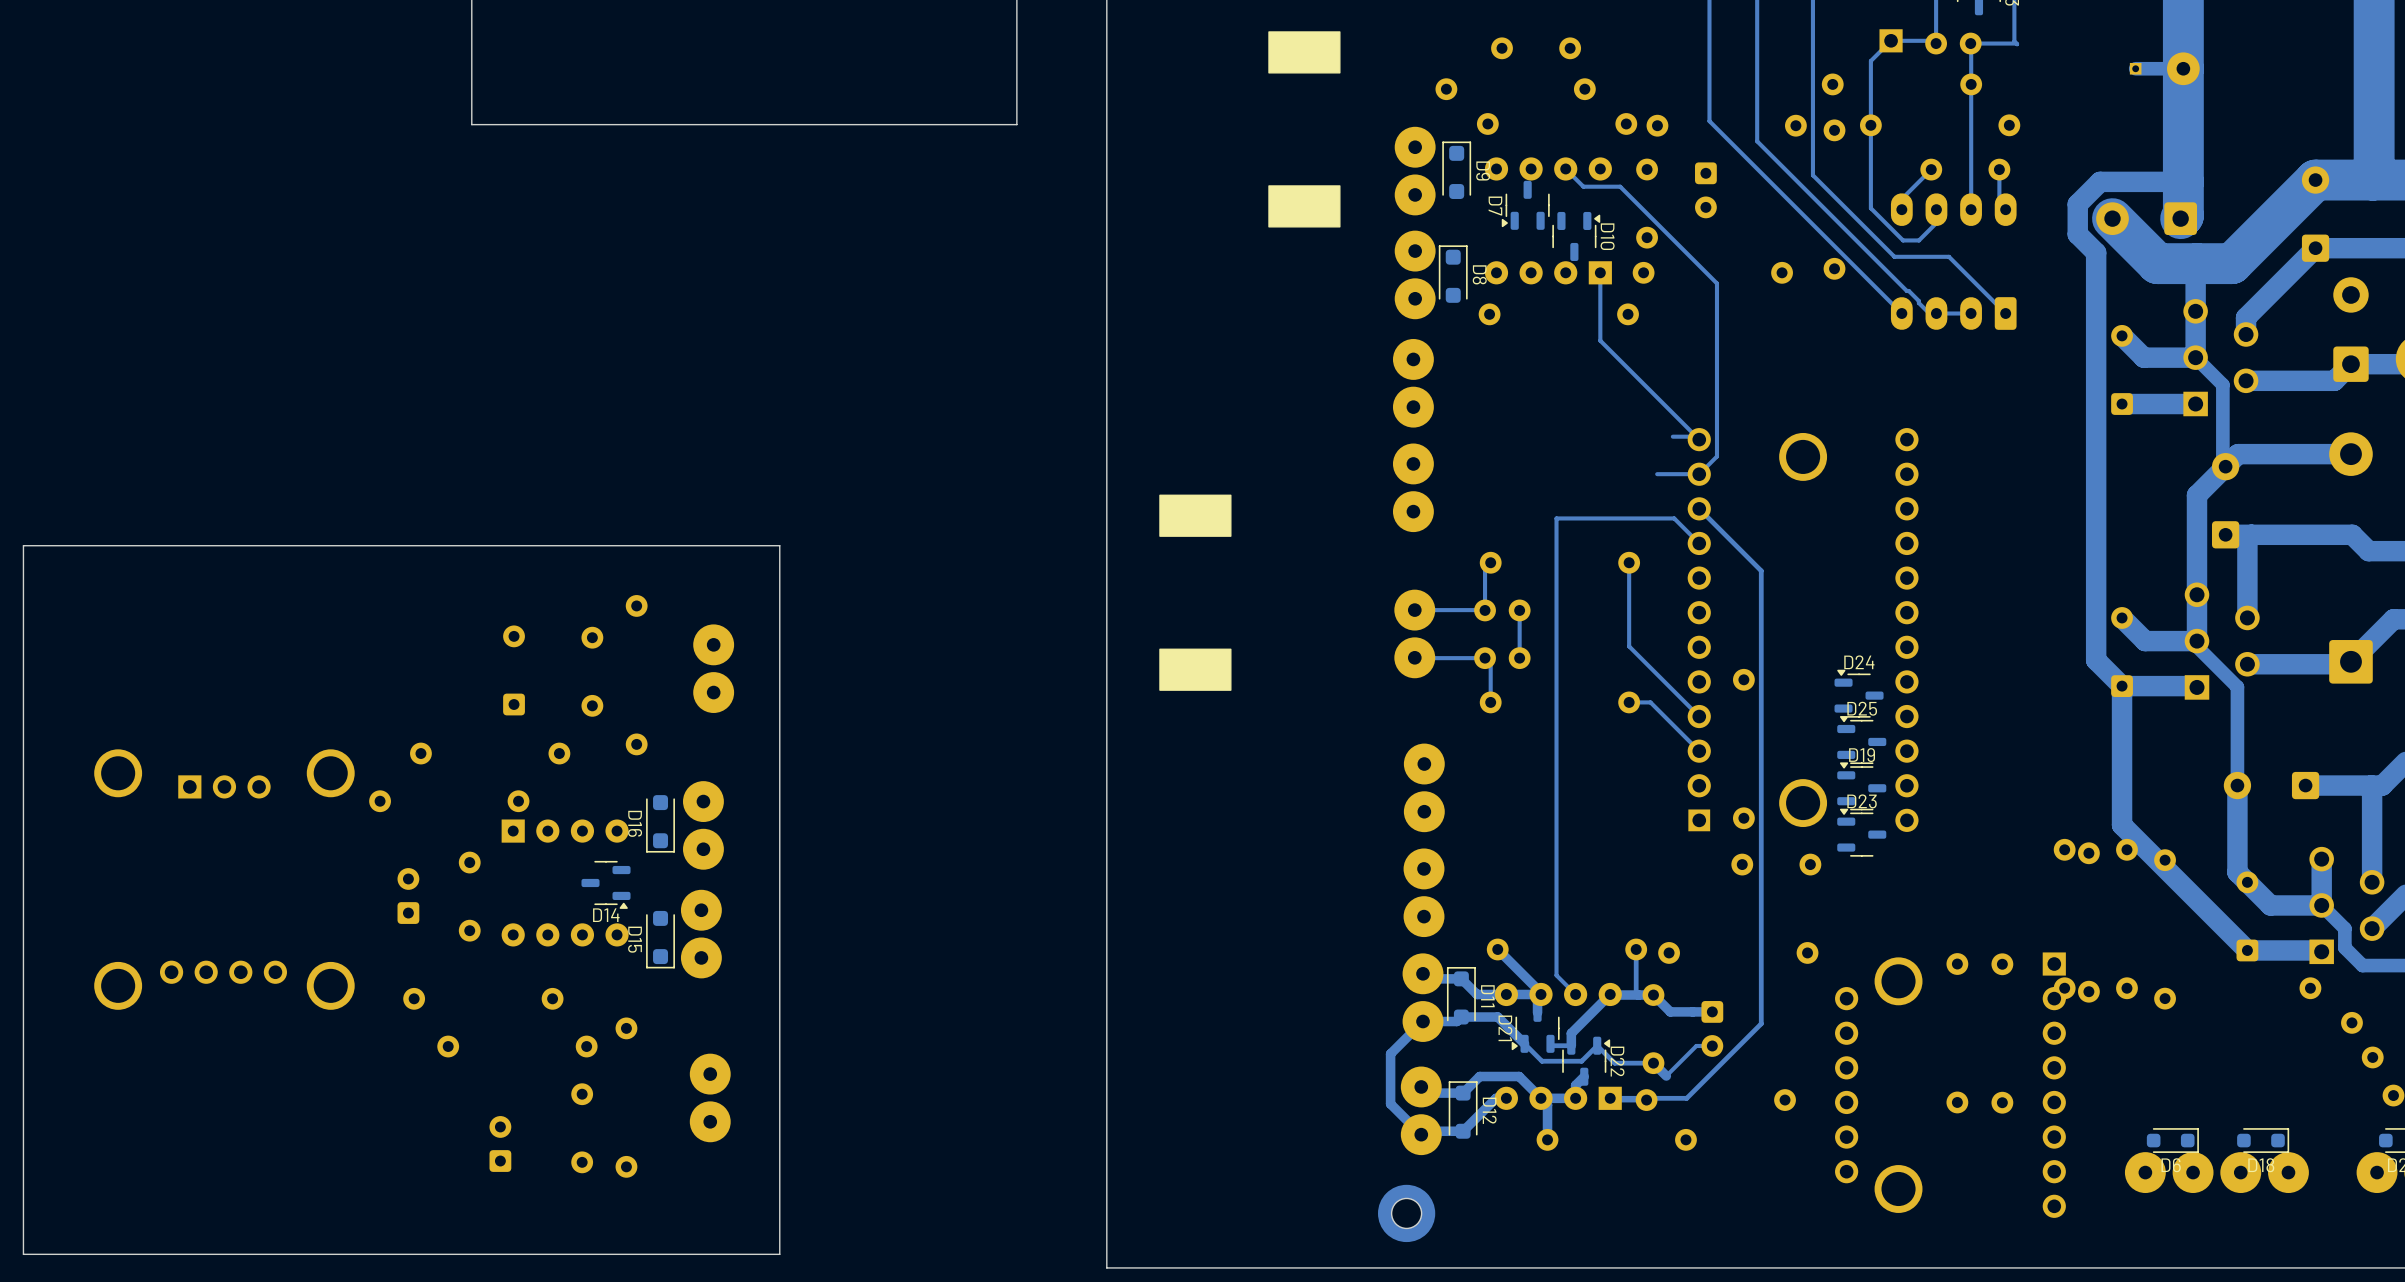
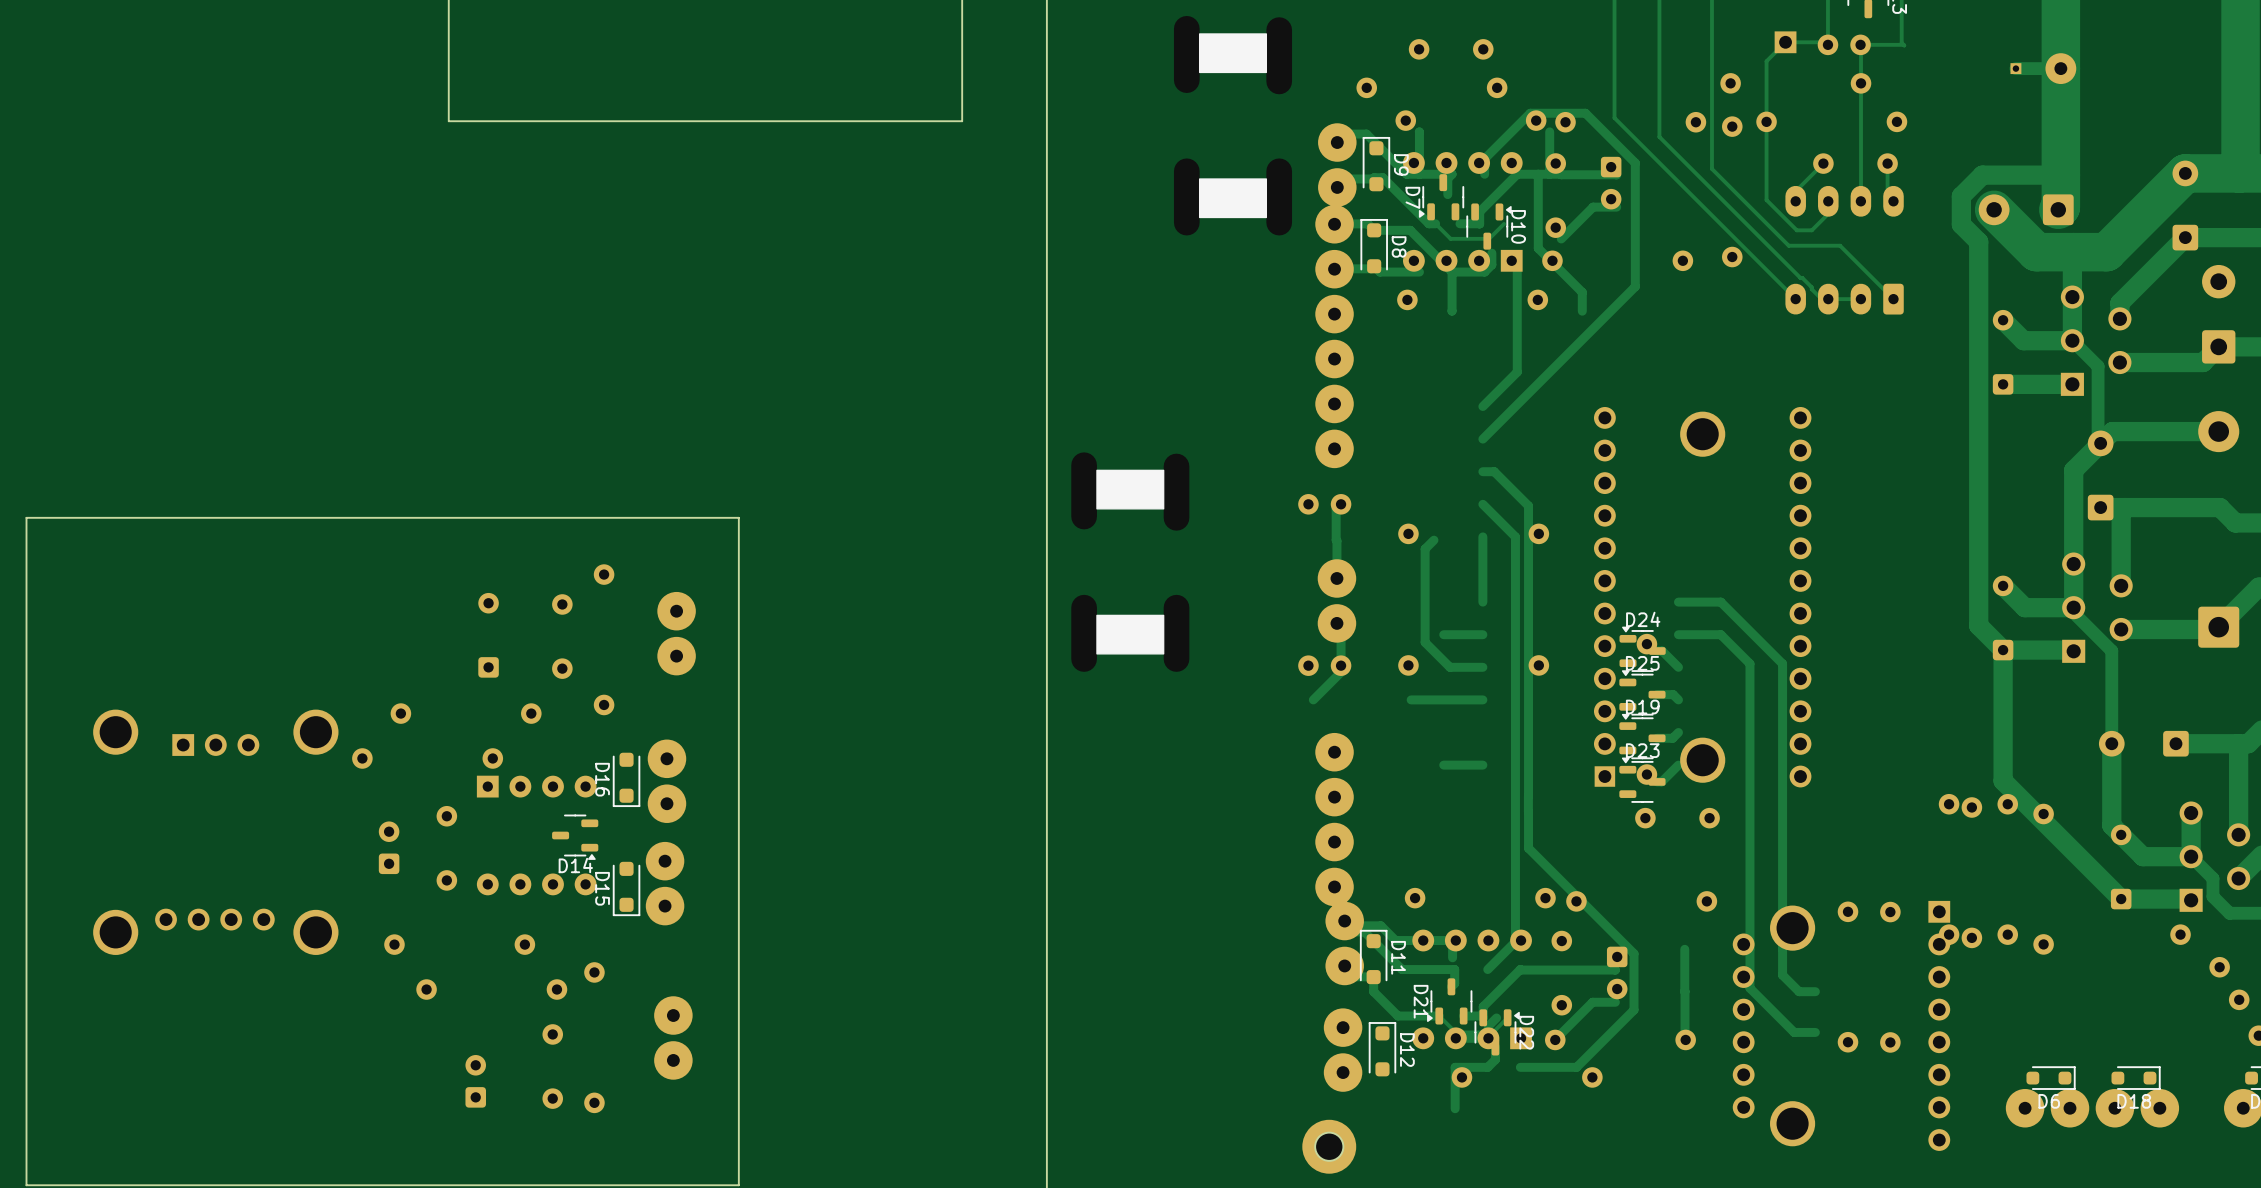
track: none -> (1549, 131) (1549, 174)
track: none -> (1419, 132) (1419, 174)
track: none -> (1334, 134) (1366, 134) (1406, 174) (1452, 174) (1447, 178) (1447, 194)
track: (1565, 168) (1583, 186) (1620, 186) (1716, 283) (1716, 456) (1699, 474) (1657, 474) -> none
track: none -> (1484, 174) (1484, 158) (1530, 113) (1585, 113) (1635, 163) (1635, 286) (1482, 439)
track: none -> (1538, 174) (1538, 248) (1582, 292) (1582, 311)
track: none -> (1616, 175) (1517, 174) (1479, 211) (1479, 223)
track: none -> (1334, 179) (1382, 177) (1428, 223) (1435, 223) (1450, 238) (1489, 238) (1504, 223)
track: none -> (1616, 207) (1593, 207) (1561, 238)
track: none -> (1479, 223) (1459, 223)
track: none -> (1334, 224) (1367, 223) (1374, 230) (1410, 230) (1452, 272)
track: none -> (1491, 253) (1491, 264) (1484, 272) (1452, 272)
track: (1600, 272) (1600, 340) (1699, 439) -> none
part position: (1415, 274) -> (1334, 246)
D8 position: (1453, 274) -> (1374, 246)
track: none -> (1334, 269) (1371, 268) (1374, 266) (1379, 272) (1419, 272)
track: none -> (1452, 272) (1452, 311)
track: none -> (1517, 272) (1517, 372) (1482, 406)
part position: (1413, 383) -> (1334, 336)
track: (1696, 436) (1672, 436) -> none
part: none -> (1334, 426)
part: (1413, 487) -> none
track: none -> (1482, 471) (1494, 471) (1528, 505) (1528, 848) (1634, 953) (1634, 1009) (1576, 1067) (1520, 1067)
track: (1699, 508) (1761, 570) (1761, 1023) (1686, 1098) (1610, 1098) (1611, 1100) (1646, 1100) -> none
part: none -> (1324, 504)
track: none -> (1482, 504) (1515, 536) (1515, 941) (1487, 969)
track: (1699, 543) (1674, 518) (1556, 518) (1556, 975) (1575, 994) -> none
track: (1490, 562) (1485, 568) (1485, 610) (1414, 610) -> (1341, 504) (1336, 509) (1336, 578)
track: (1629, 562) (1629, 646) (1699, 716) -> none
track: none -> (1482, 536) (1482, 602)
track: none -> (1433, 540) (1425, 549) (1425, 642) (1450, 667) (1482, 667)
part: (1502, 610) -> none
track: (1519, 610) (1519, 658) -> none
track: none -> (1678, 602) (1720, 602) (1782, 663) (1782, 975) (1799, 991) (1815, 991)
track: (1415, 658) (1485, 658) (1490, 663) (1490, 702) -> (1336, 623) (1341, 627) (1341, 672) (1313, 699)
part: (1502, 658) -> none
track: none -> (1482, 634) (1443, 634)
track: none -> (1678, 634) (1720, 634) (1749, 663) (1749, 988) (1794, 1032) (1815, 1032)
track: none -> (1657, 651) (1662, 651) (1678, 667)
D24 position: (1859, 693) -> (1642, 649)
part: none -> (1324, 665)
track: (1629, 702) (1650, 702) (1699, 751) -> none
track: none -> (1657, 694) (1673, 694) (1678, 699)
track: none -> (1482, 699) (1411, 699)
D25 position: (1861, 740) -> (1642, 692)
track: none -> (1678, 732) (1672, 738) (1657, 738)
D19 position: (1861, 786) -> (1642, 736)
part position: (1424, 787) -> (1334, 774)
track: none -> (1482, 765) (1443, 765)
track: none -> (1678, 765) (1661, 781) (1657, 781)
D23 position: (1861, 832) -> (1642, 780)
part position: (1424, 892) -> (1334, 864)
track: (1497, 949) (1541, 994) -> none
track: (1636, 949) (1636, 992) (1638, 995) -> none
track: none -> (1334, 931) (1364, 931) (1402, 969) (1454, 969) (1454, 983) (1451, 986)
D11 position: (1461, 995) -> (1373, 957)
track: none -> (1684, 949) (1684, 1032)
track: (1712, 1011) (1670, 1011) (1653, 995) (1610, 994) (1571, 1033) (1571, 1045) (1552, 1045) (1550, 1043) -> none
track: none -> (1615, 970) (1520, 969) (1483, 1006) (1483, 1017) (1481, 1016) (1463, 1016)
D21 position: (1535, 1028) -> (1449, 1001)
track: none -> (1334, 976) (1373, 976) (1373, 991) (1397, 1016) (1439, 1016) (1455, 1032) (1492, 1032) (1507, 1017)
track: (1712, 1045) (1696, 1045) (1666, 1076) (1653, 1063) (1614, 1063) (1597, 1045) (1581, 1061) (1541, 1061) (1497, 1017) (1461, 1017) (1456, 1021) (1423, 1021) (1390, 1053) (1390, 1103) (1421, 1134) (1424, 1131) (1463, 1131) (1496, 1098) (1506, 1098) -> none
track: none -> (1615, 1002) (1592, 1002) (1560, 1034)
D22 position: (1586, 1061) -> (1497, 1032)
track: (1421, 1086) (1427, 1093) (1463, 1093) (1479, 1076) (1519, 1076) (1547, 1104) (1547, 1139) -> none
track: none -> (1495, 1046) (1495, 1059) (1487, 1067) (1455, 1067) (1455, 1108)

